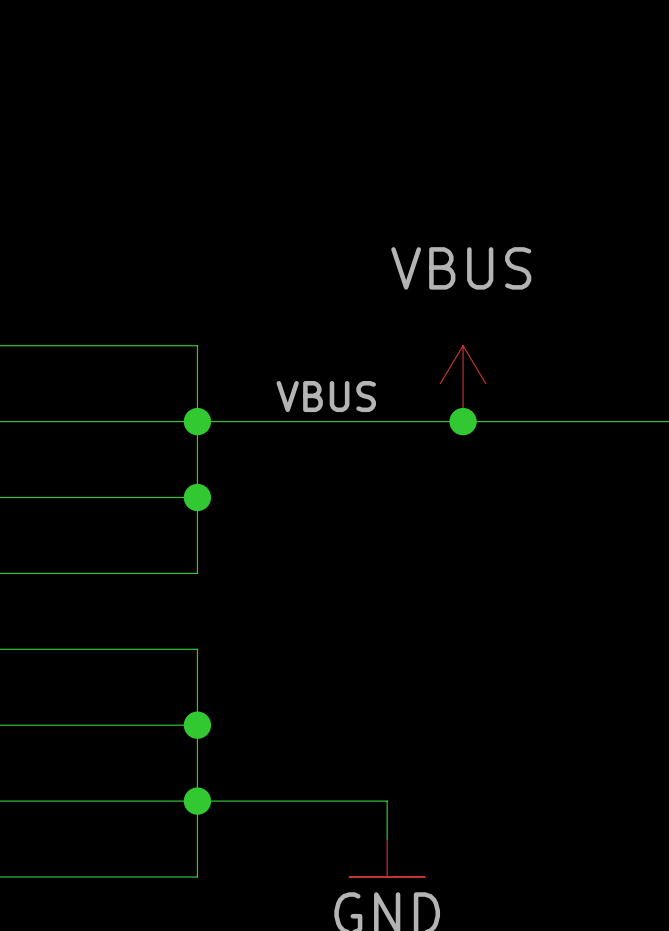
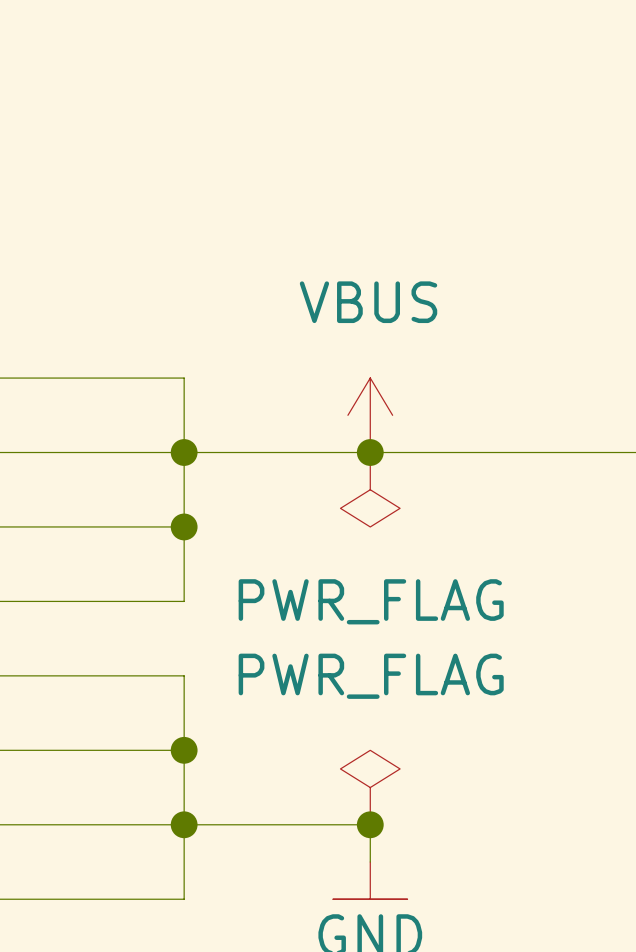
power symbol position: VBUS (463, 383) -> VBUS (370, 415)
label: VBUS (326, 396) -> none
junction position: (463, 421) -> (370, 452)
power symbol: none -> PWR_FLAG (370, 489)
power symbol: none -> PWR_FLAG (370, 787)
junction: none -> (370, 824)

